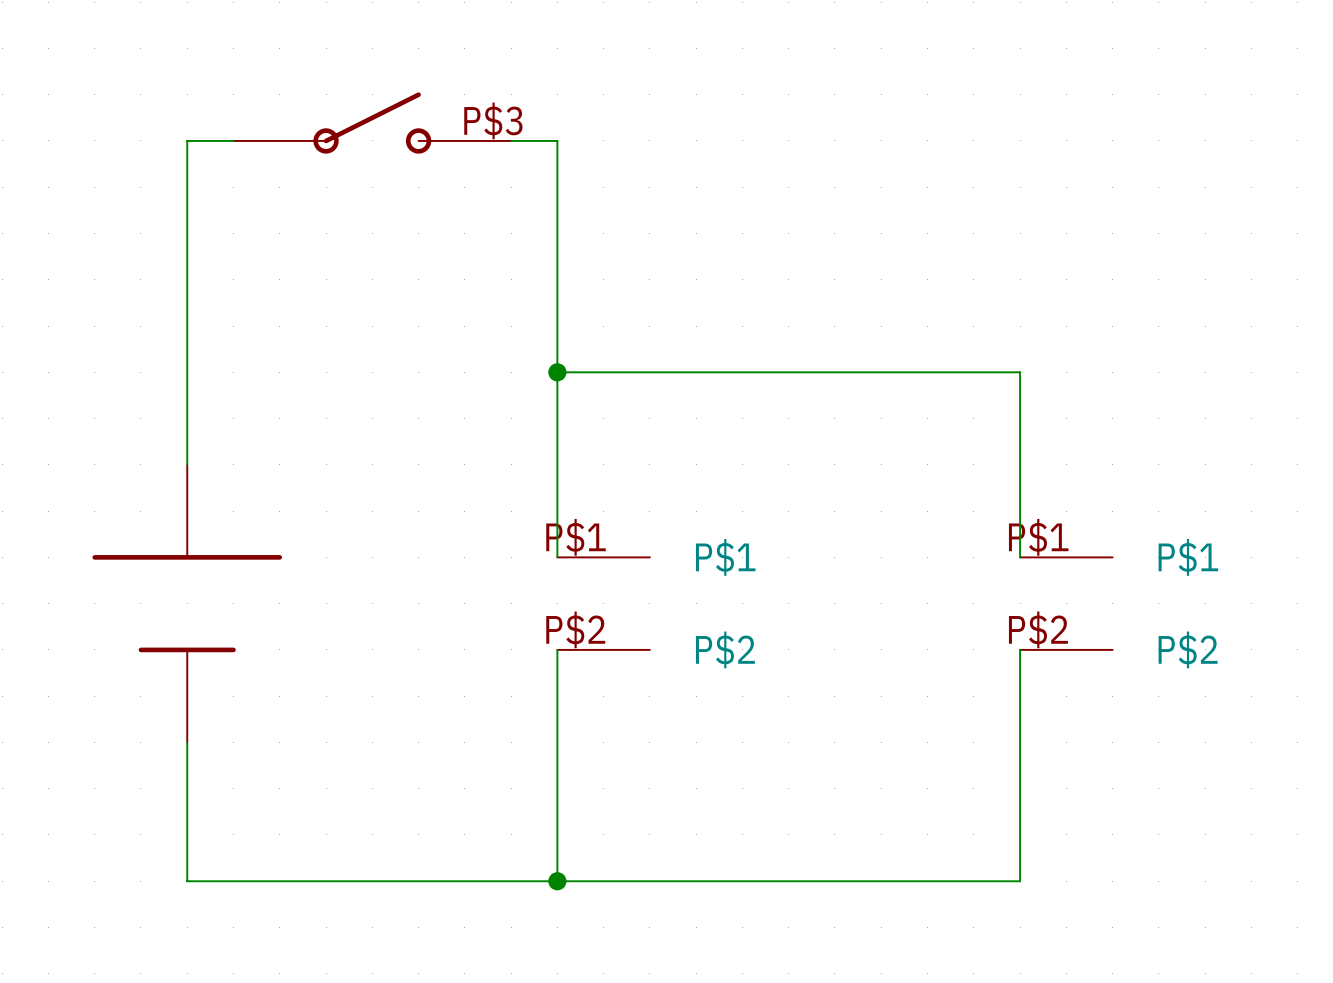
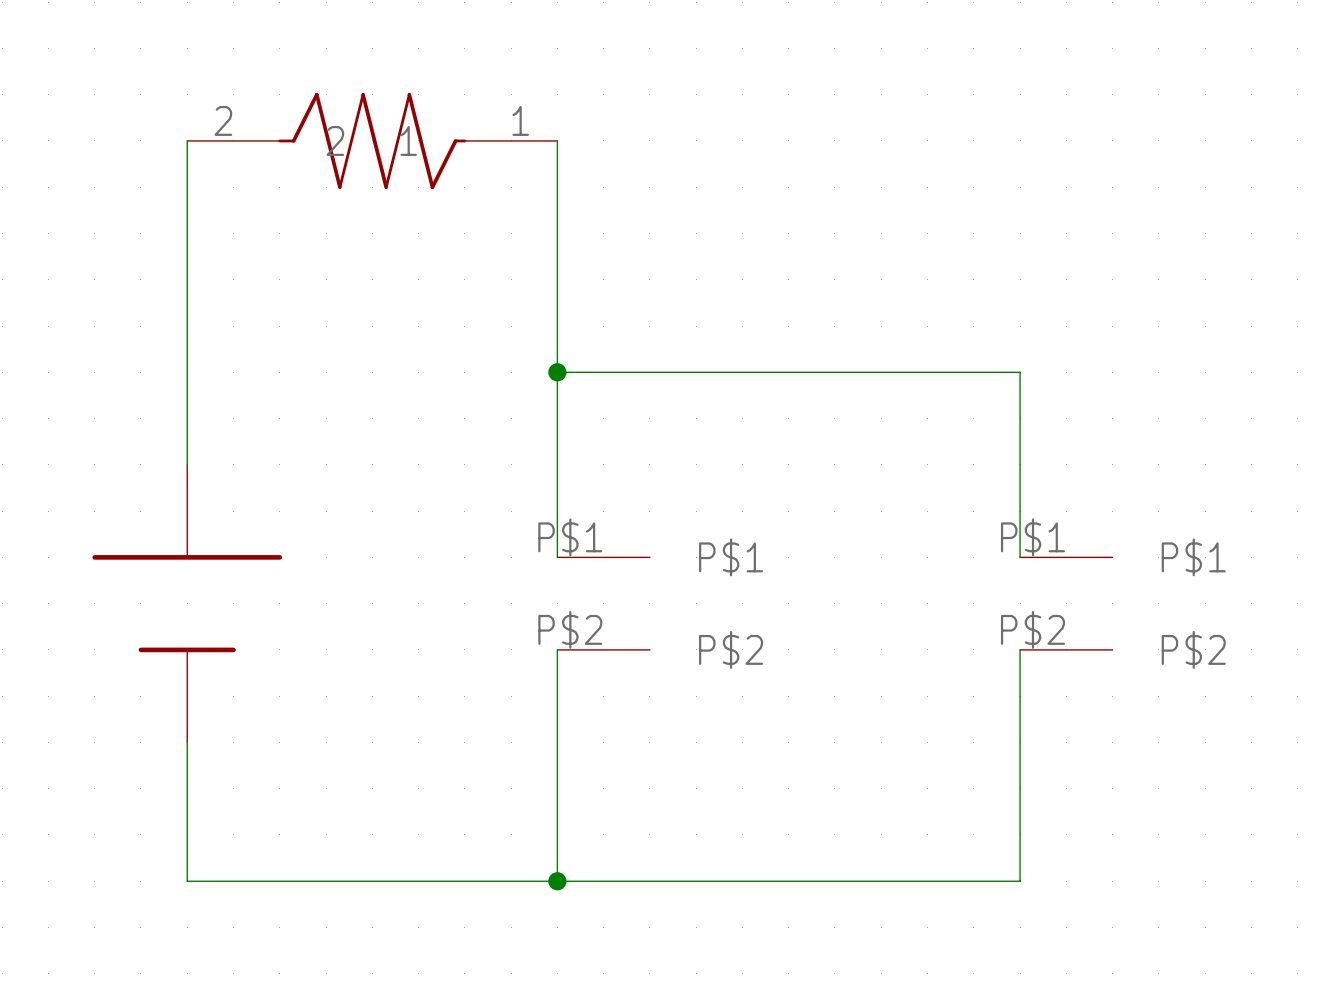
part symbol: [233, 92, 512, 154] -> [187, 92, 558, 190]

